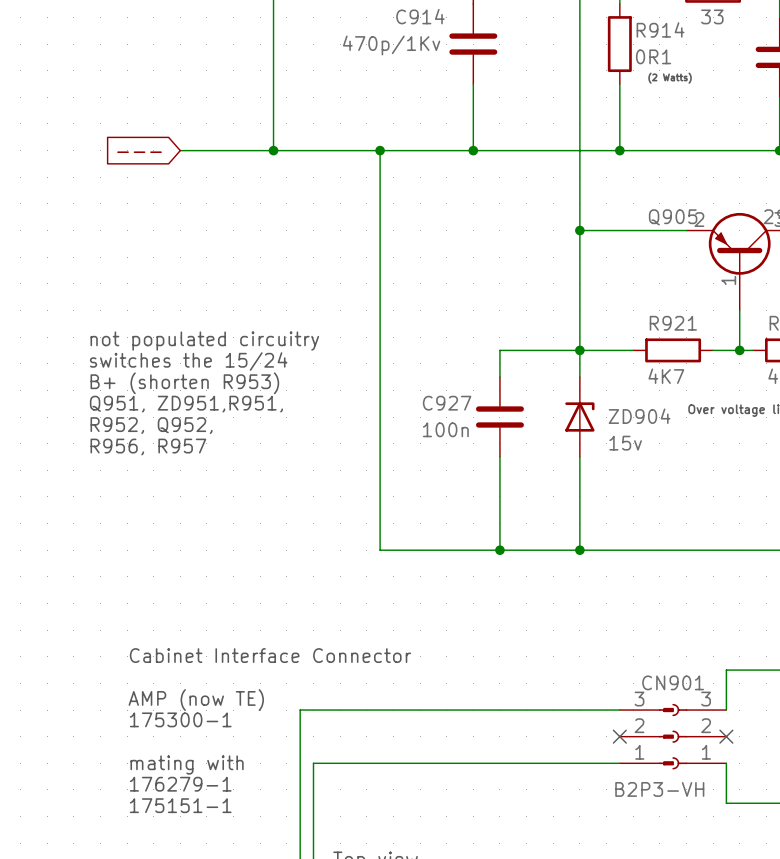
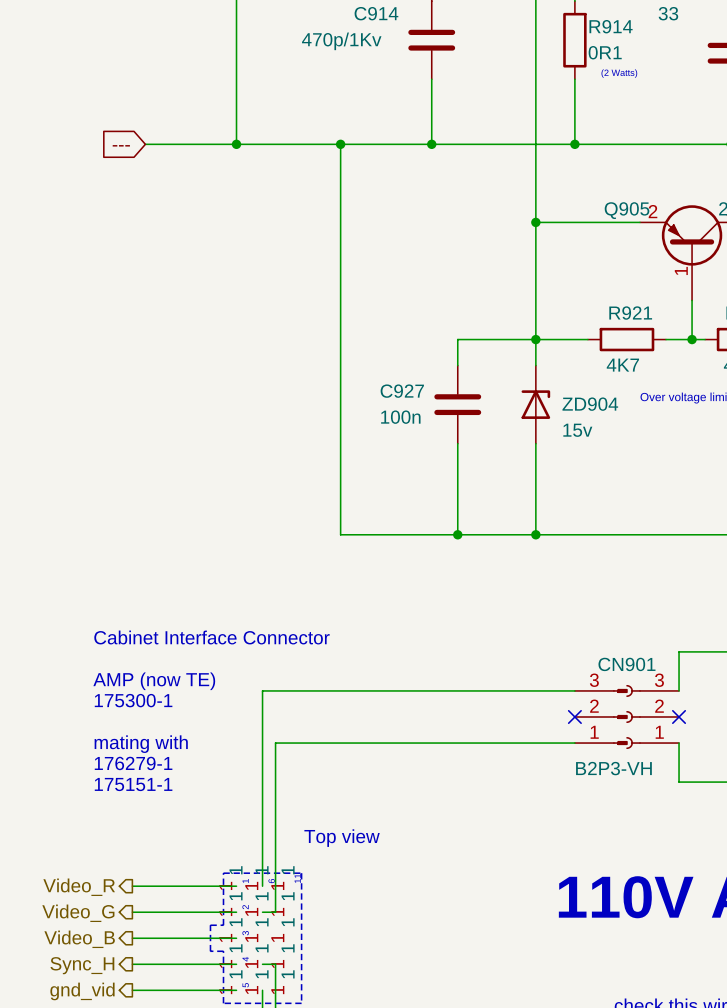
text: not populated circuitry (204, 341) -> none
text: switches the 15/24 (188, 361) -> none
text: B+ (shorten R953) (184, 383) -> none
text: Q951, ZD951,R951, (186, 404) -> none
text: R952, Q952, (151, 425) -> none
text: R956, R957 (148, 447) -> none

